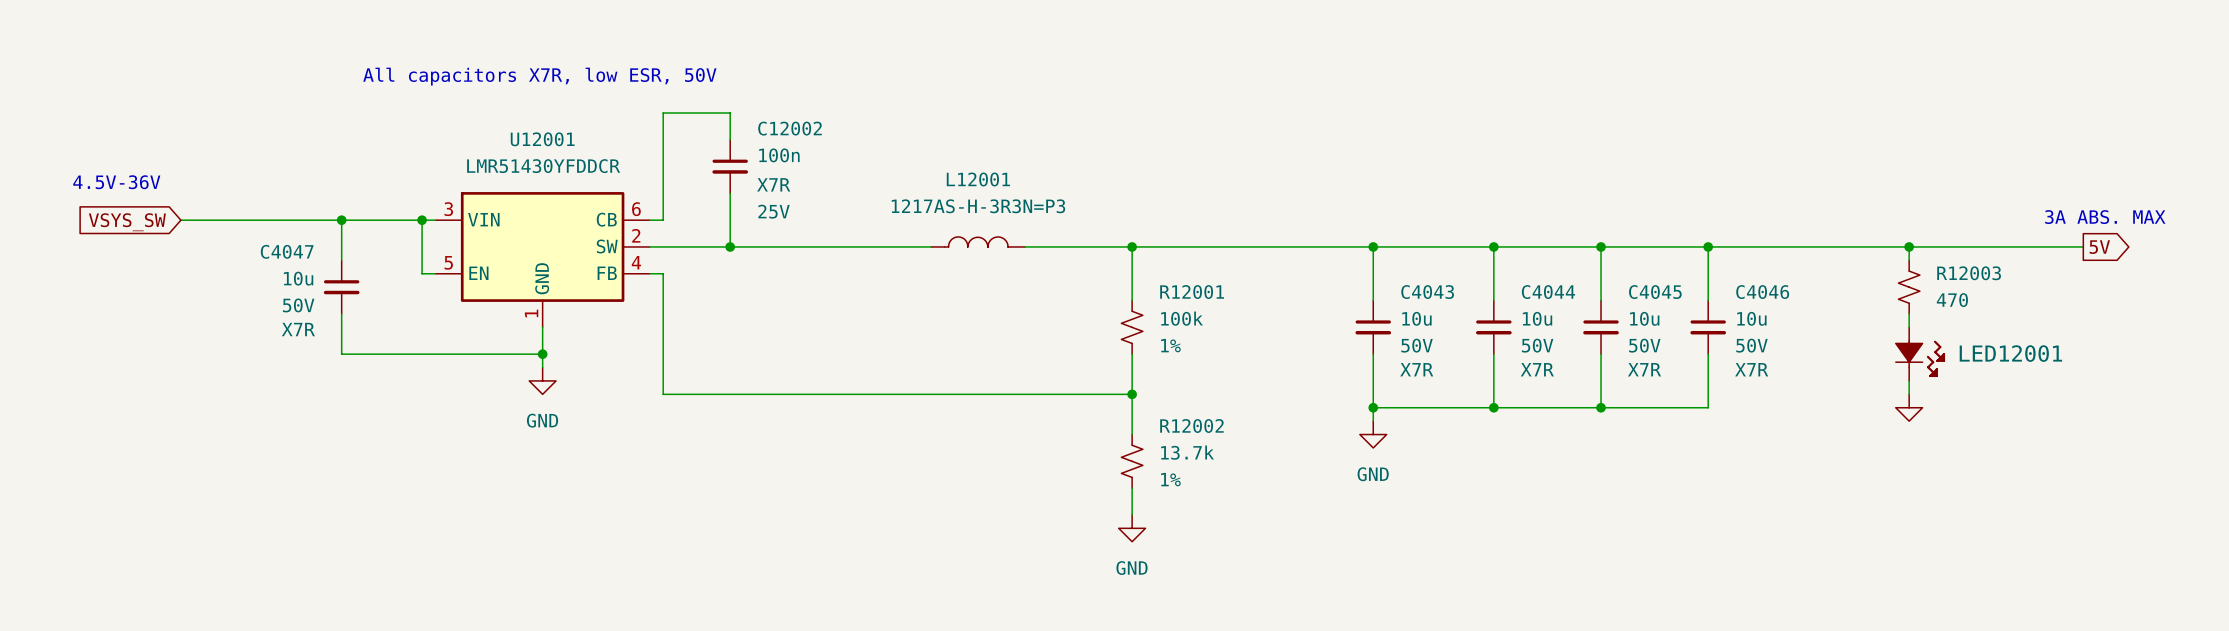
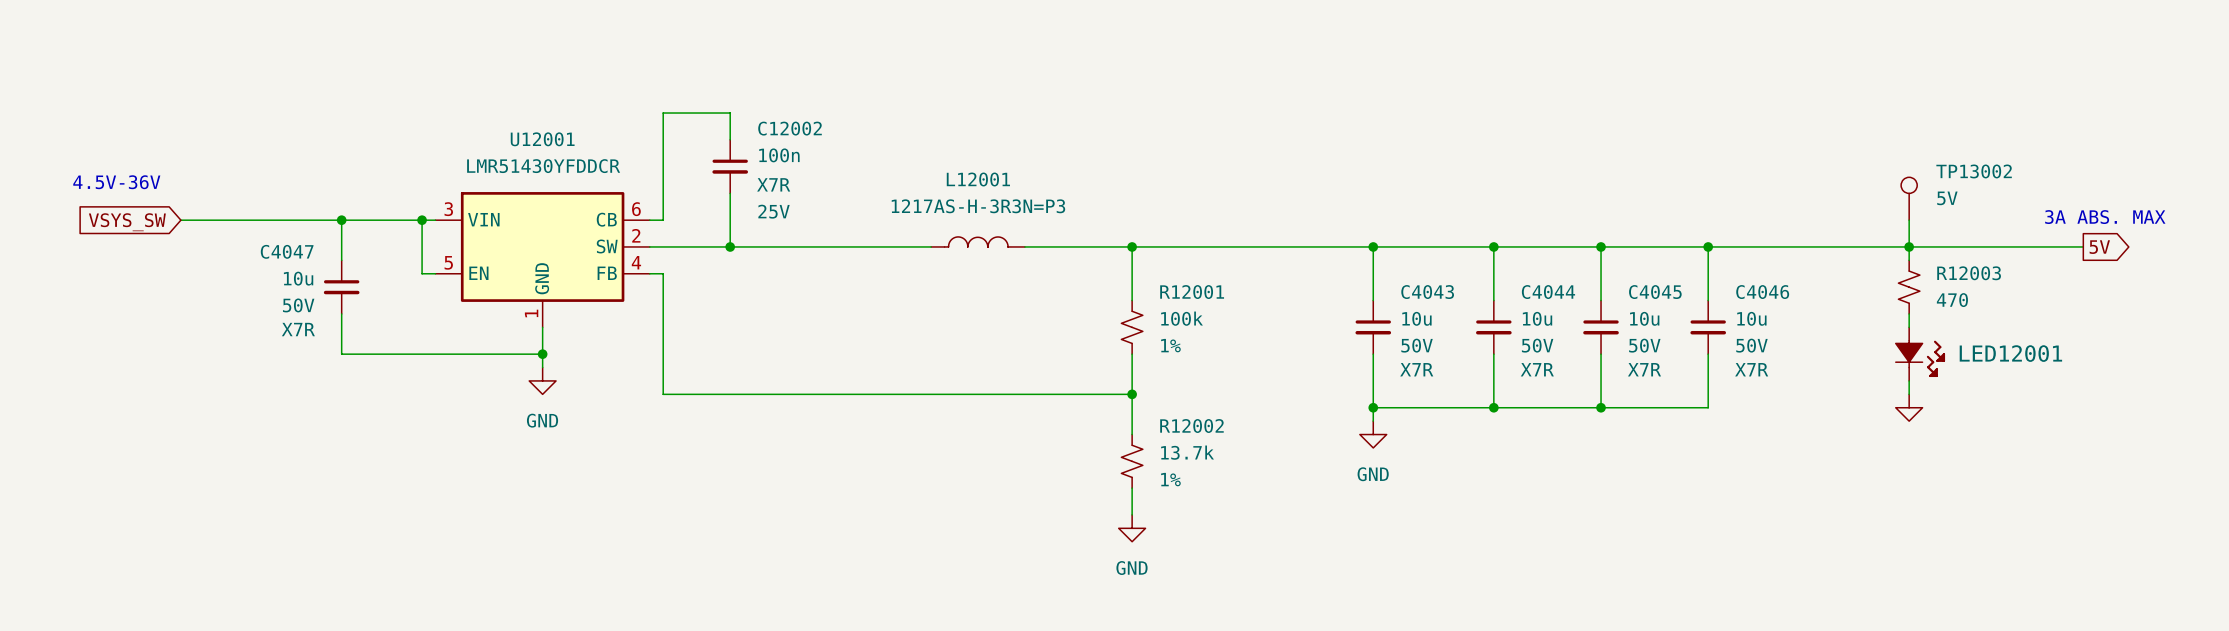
text: All capacitors X7R, low ESR, 50V (539, 76) -> none
TP13002: none -> 5V (1909, 198)
wire: none -> (1909, 220) (1909, 246)

